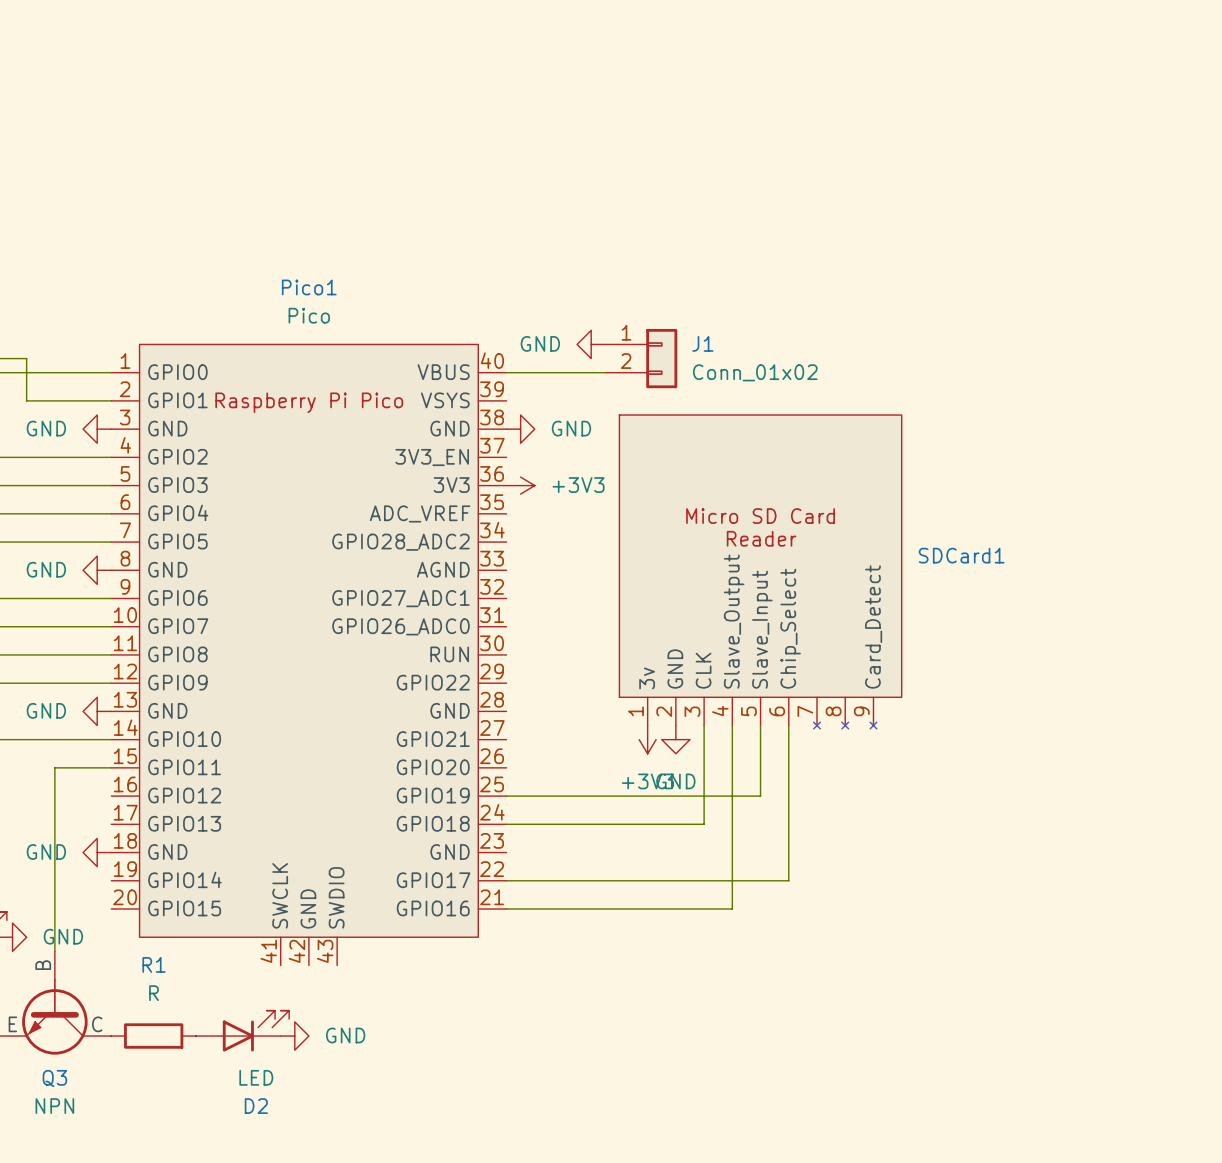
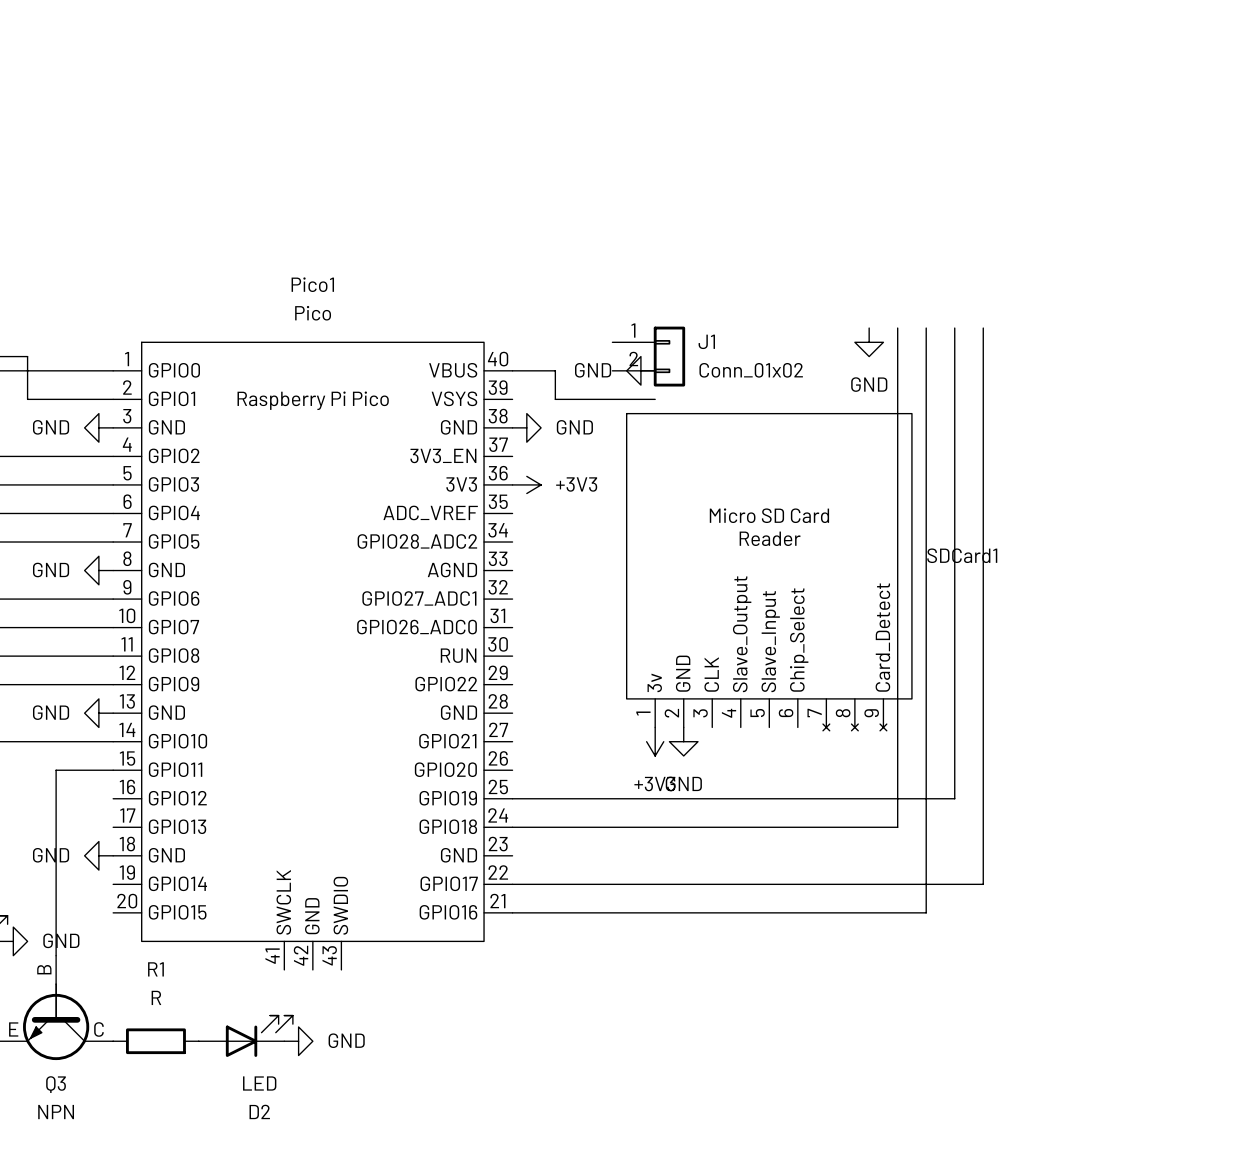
power symbol position: GND (591, 344) -> GND (640, 370)
power symbol: none -> GND (869, 342)
wire: (548, 372) (605, 372) -> (555, 370) (555, 399) (655, 399)
wire: (704, 725) (704, 824) -> (897, 328) (897, 827) (712, 827)
wire: (732, 725) (732, 909) -> (926, 328) (926, 912) (740, 912)
wire: (760, 725) (760, 796) -> (954, 328) (954, 798) (769, 798)
wire: (788, 725) (788, 880) -> (983, 328) (983, 884) (797, 884)

